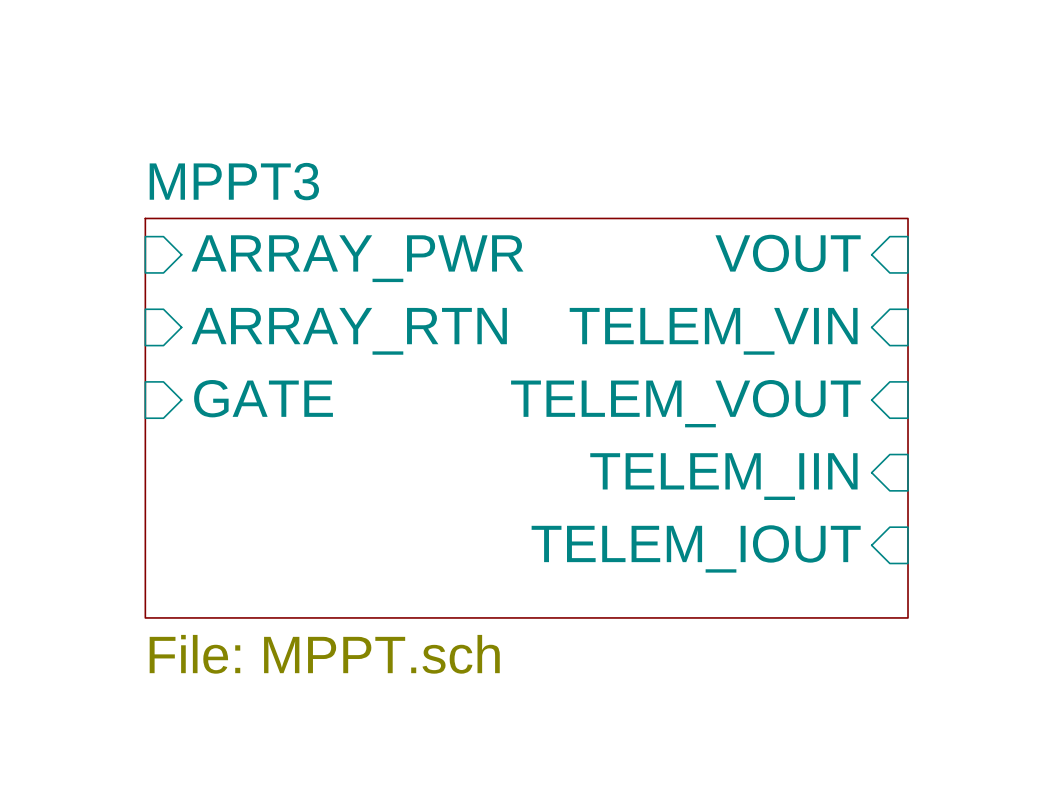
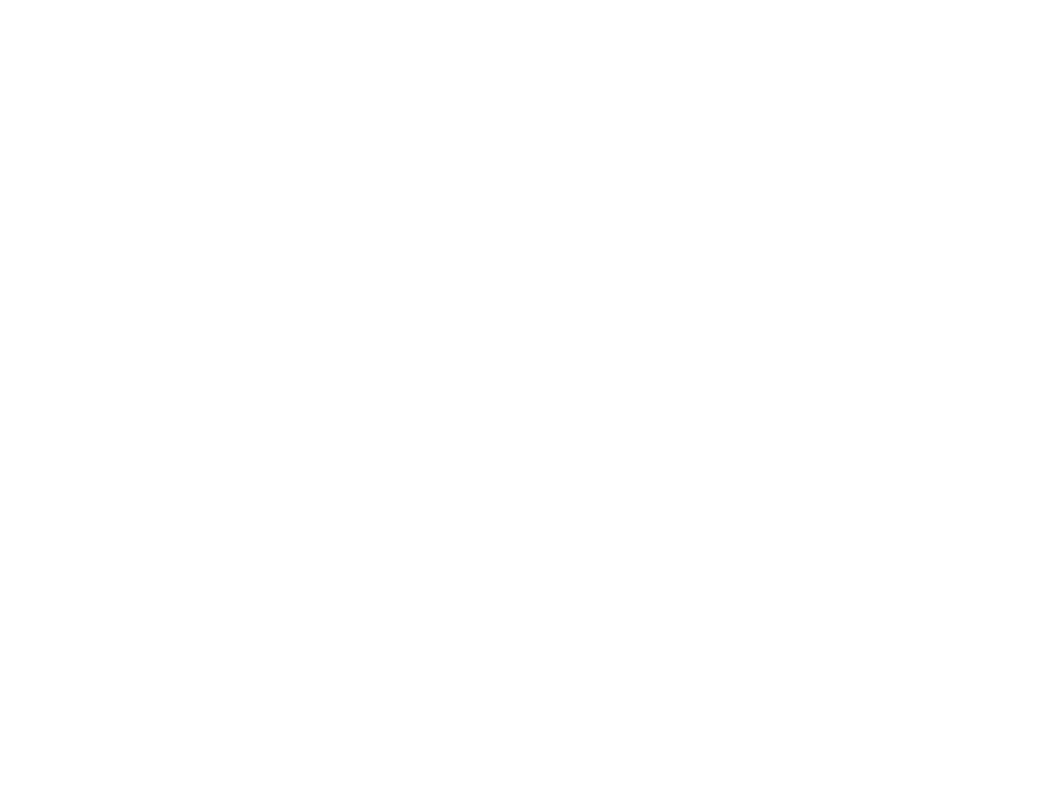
sheet pin: VOUT (788, 253) -> none
sheet pin: ARRAY_PWR (357, 258) -> none
sheet pin: ARRAY_RTN (349, 331) -> none
sheet pin: TELEM_VIN (713, 331) -> none
sheet pin: GATE (263, 398) -> none
sheet pin: TELEM_VOUT (685, 403) -> none
sheet MPPT3: File: MPPT.sch (526, 418) -> none
sheet pin: TELEM_IIN (723, 476) -> none
sheet pin: TELEM_IOUT (696, 548) -> none

